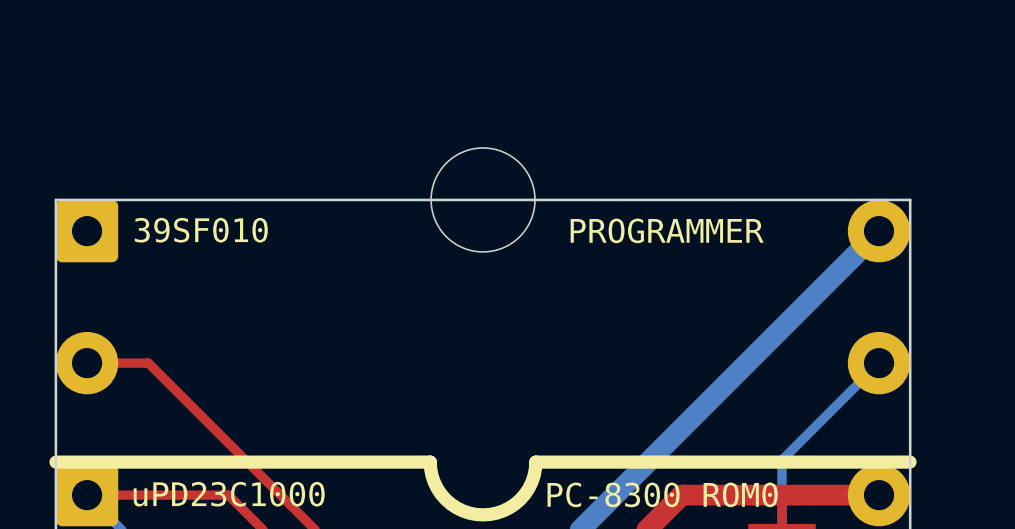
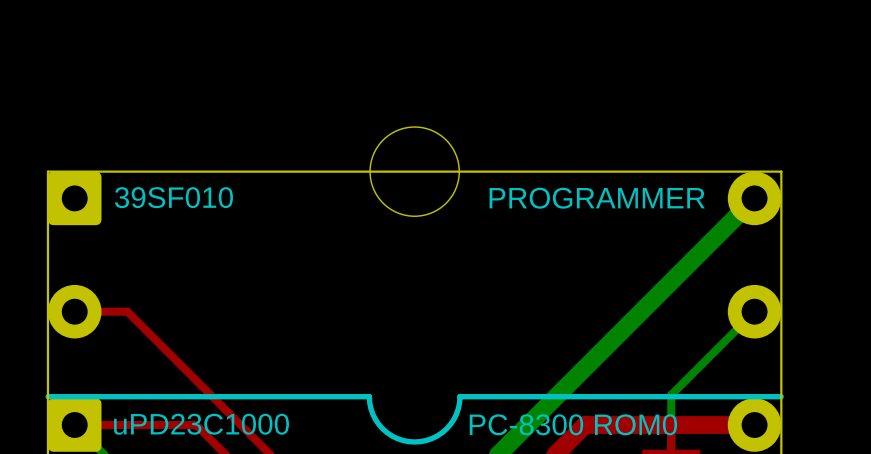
line width: thick (56, 462) (430, 462) (434, 482) (445, 499) (462, 510) (483, 514) (503, 510) (520, 499) (531, 482) (535, 462) (910, 462) -> thin (48, 396) (369, 396) (372, 414) (382, 428) (397, 438) (414, 442) (432, 438) (446, 428) (456, 414) (459, 396) (781, 396)

